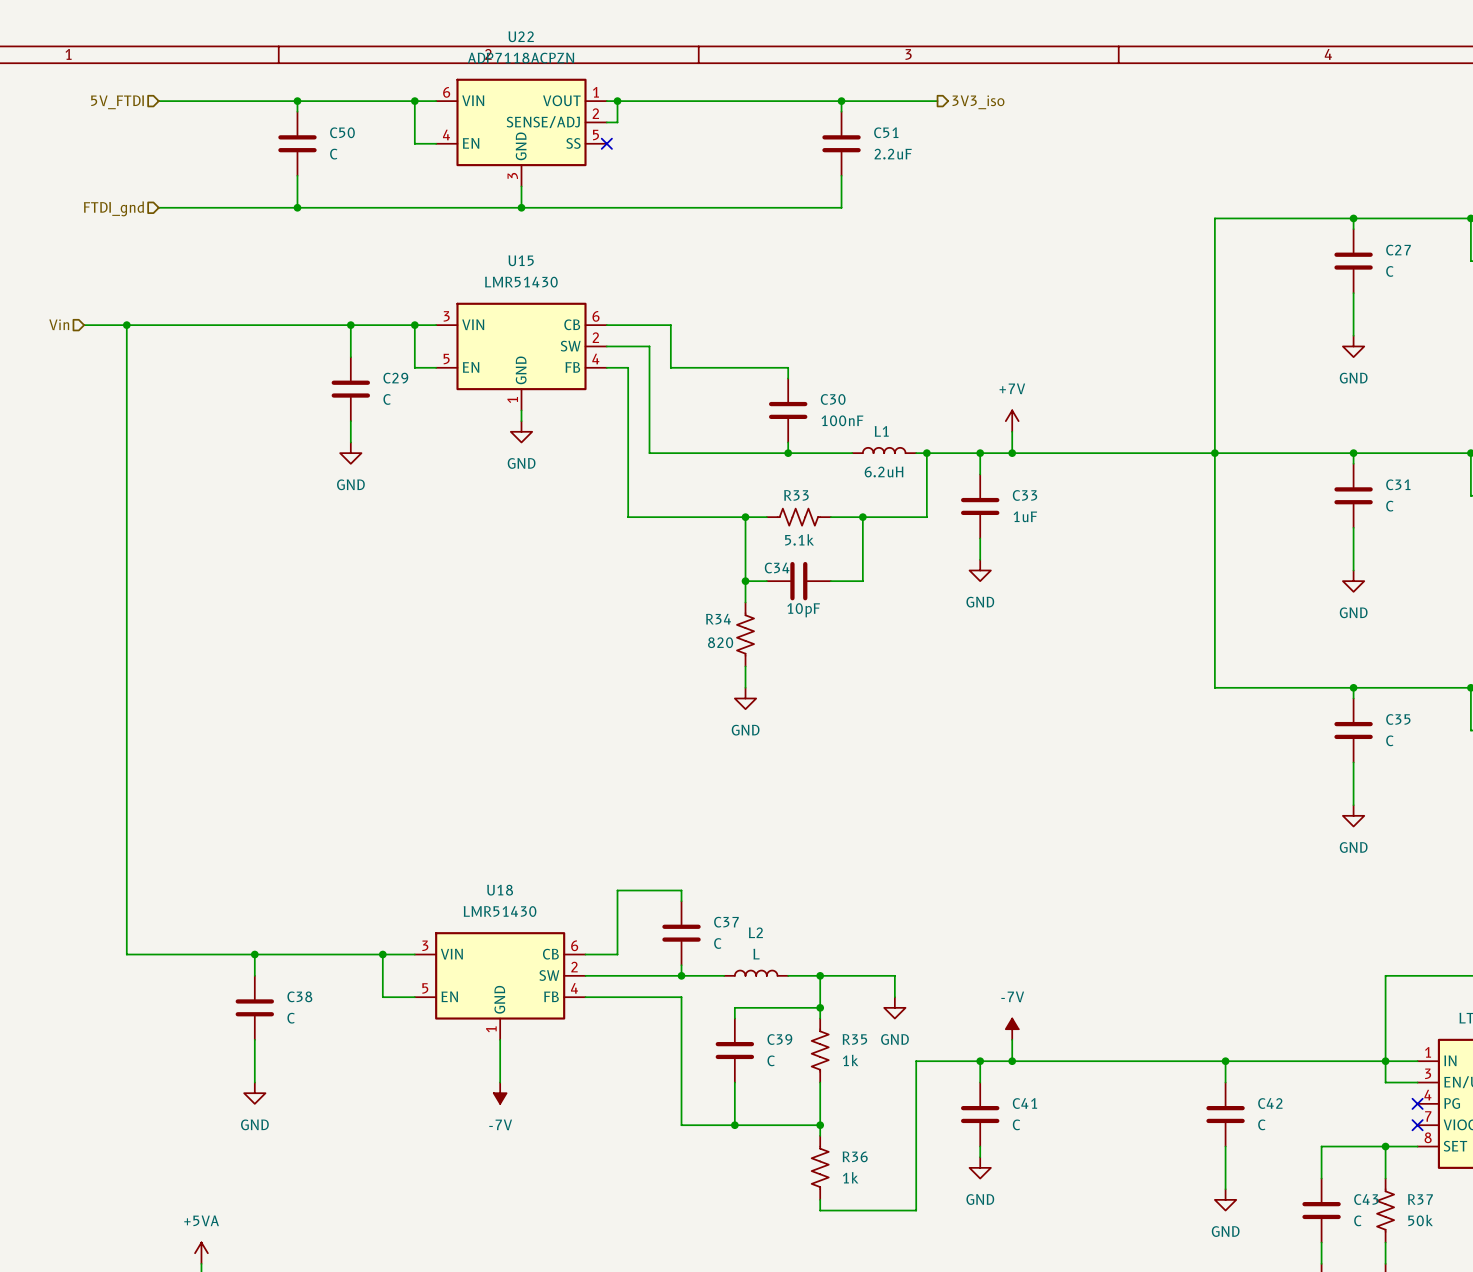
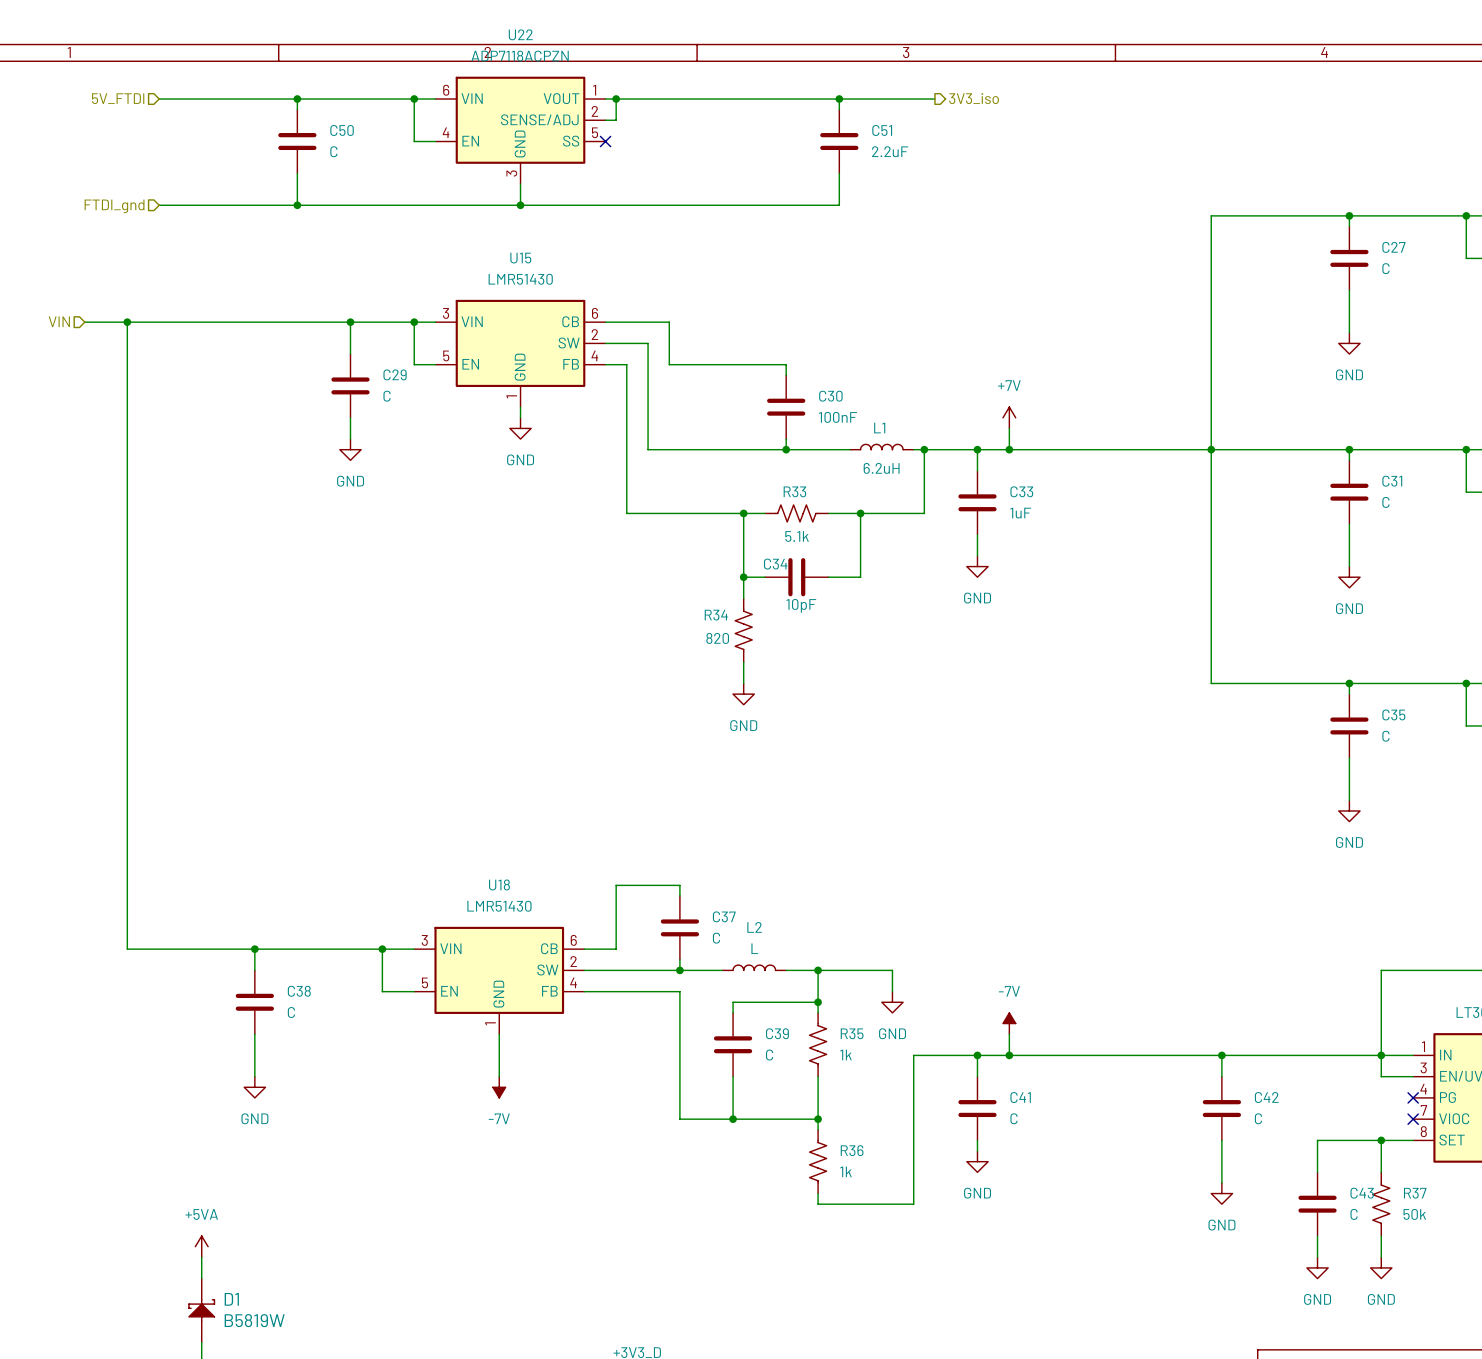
hierarchical label: Vin (59, 324) -> VIN (59, 321)

